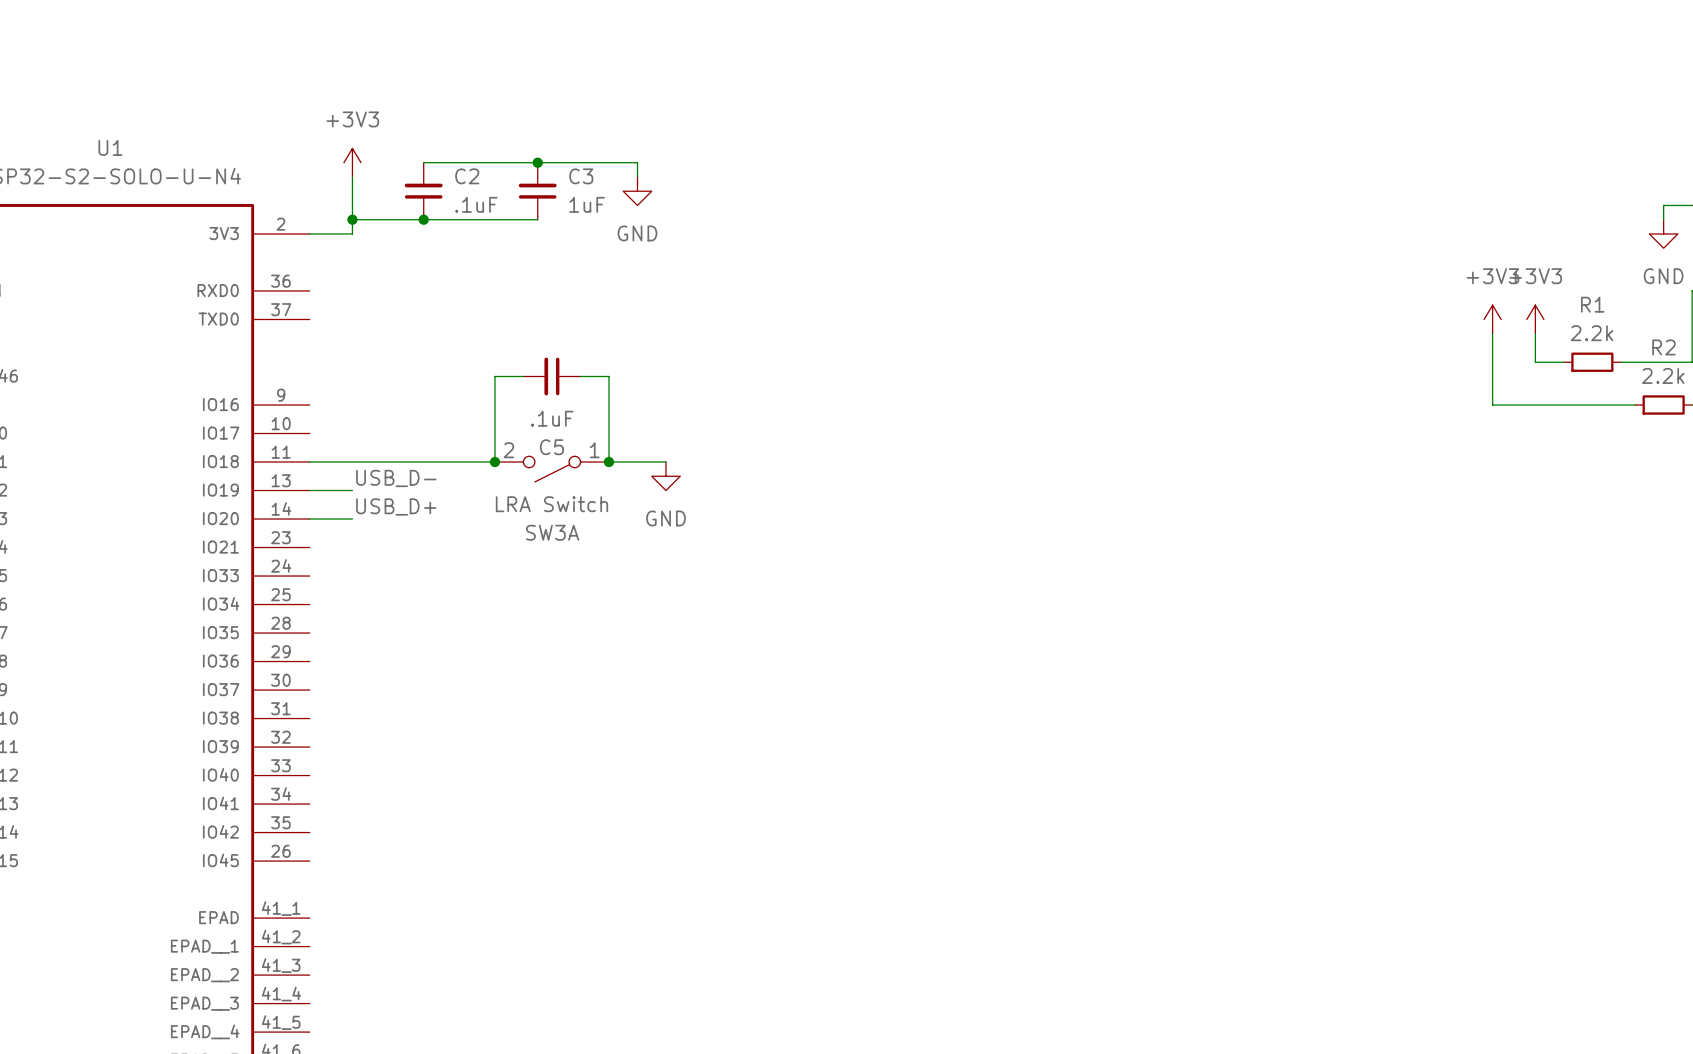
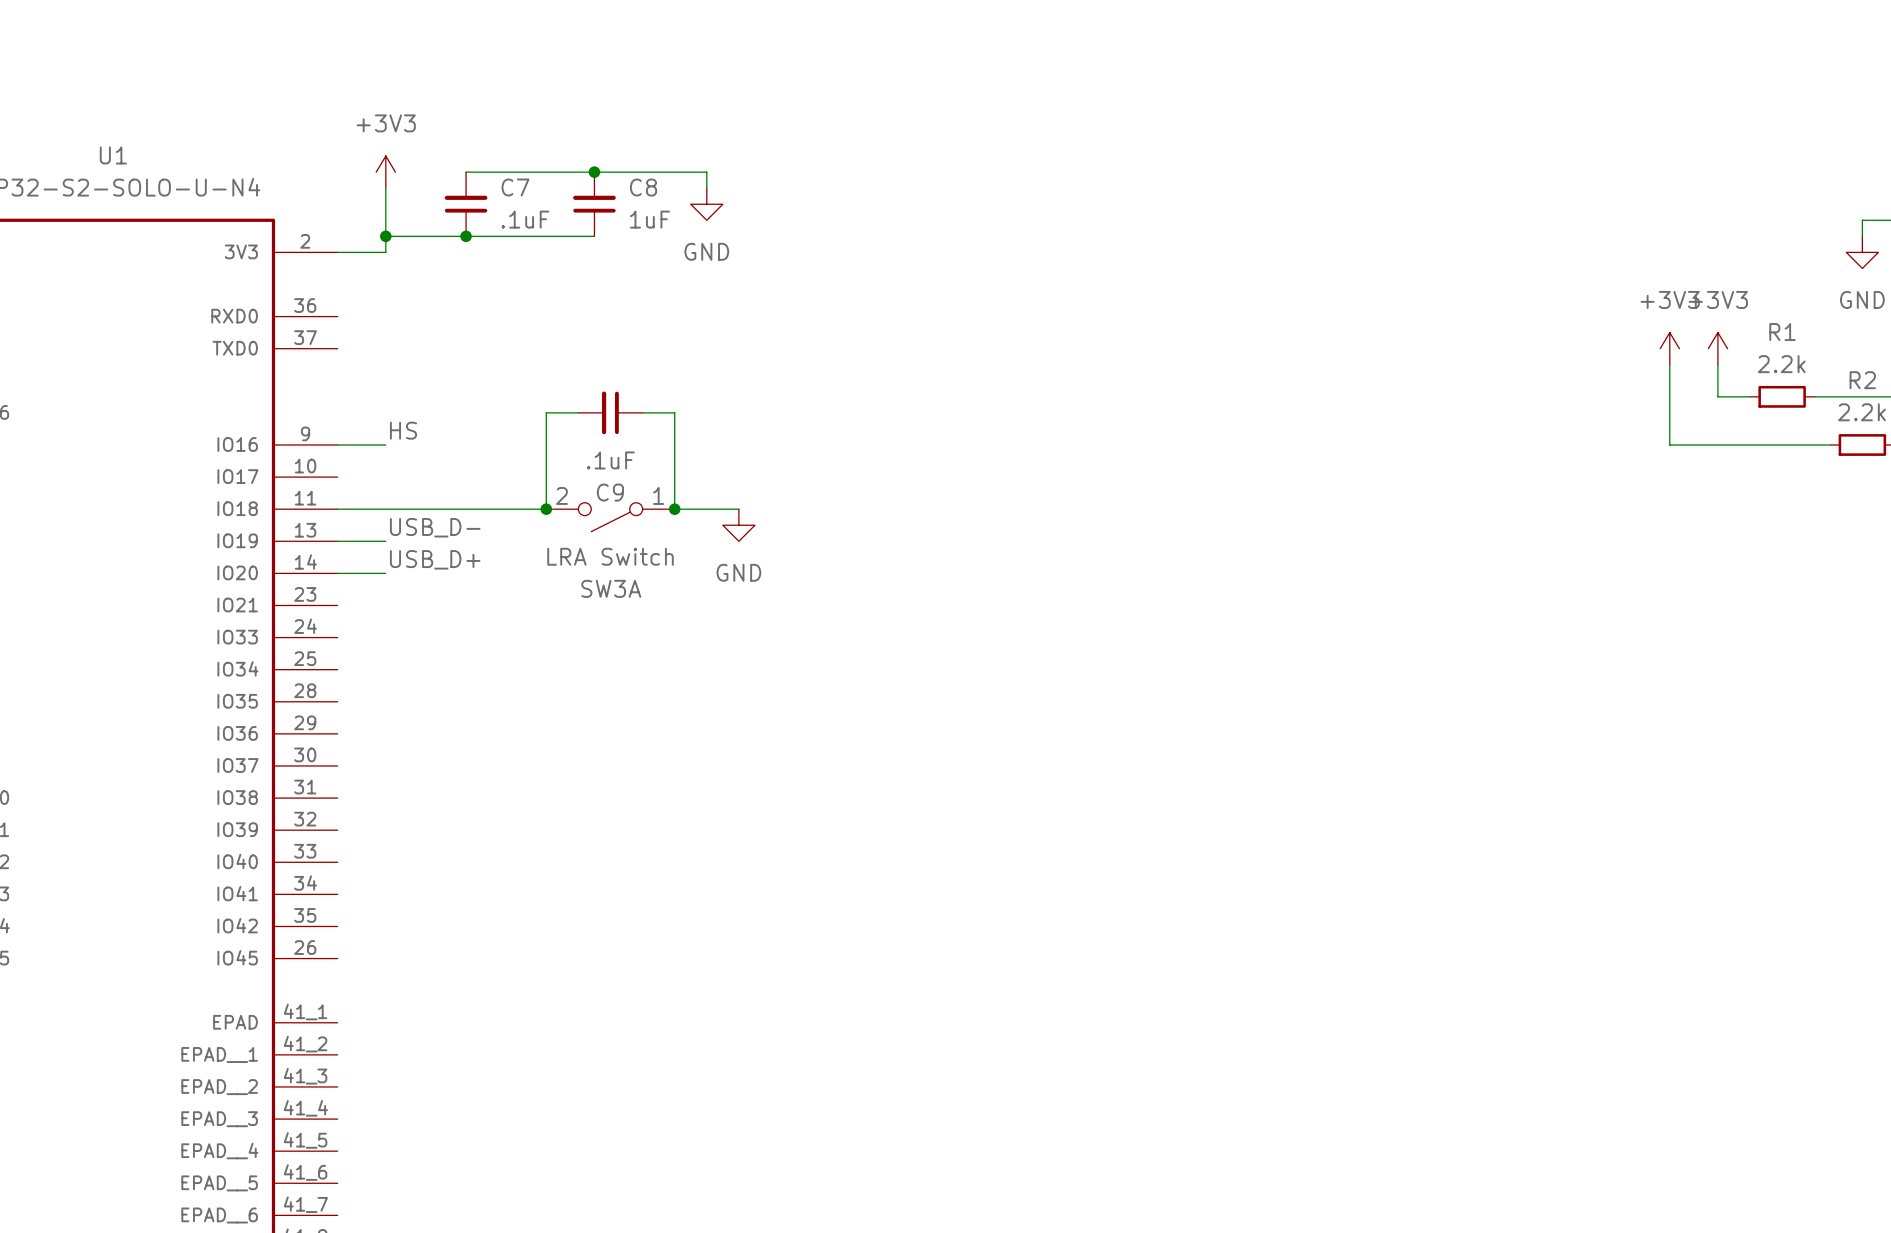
C2 name: C2 (467, 176) -> C7 (515, 187)
C3 name: C3 (581, 176) -> C8 (643, 187)
label: none -> HS (403, 430)
wire: none -> (337, 444) (385, 444)
C5 name: C5 (551, 447) -> C9 (610, 492)

